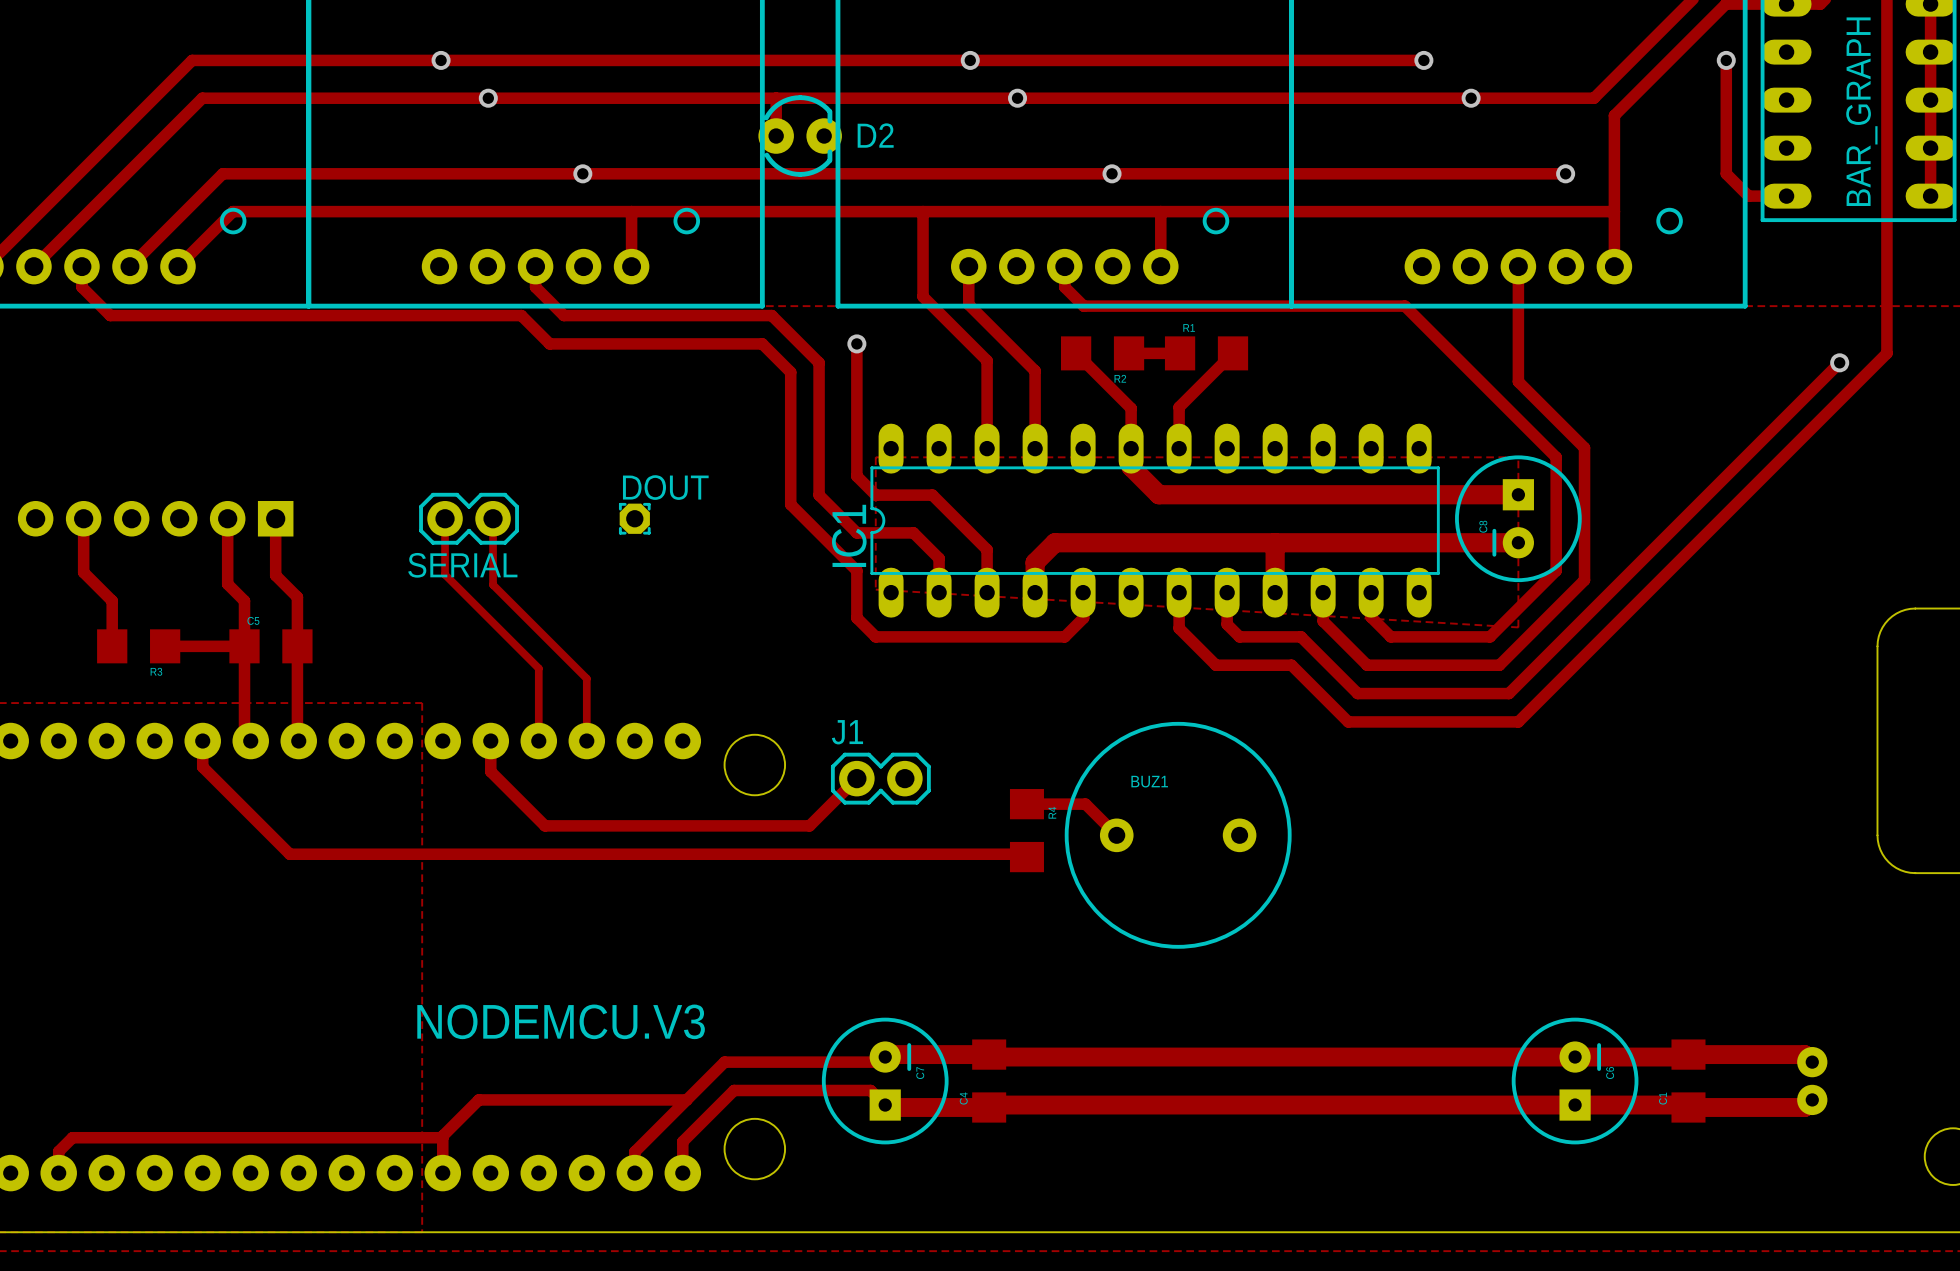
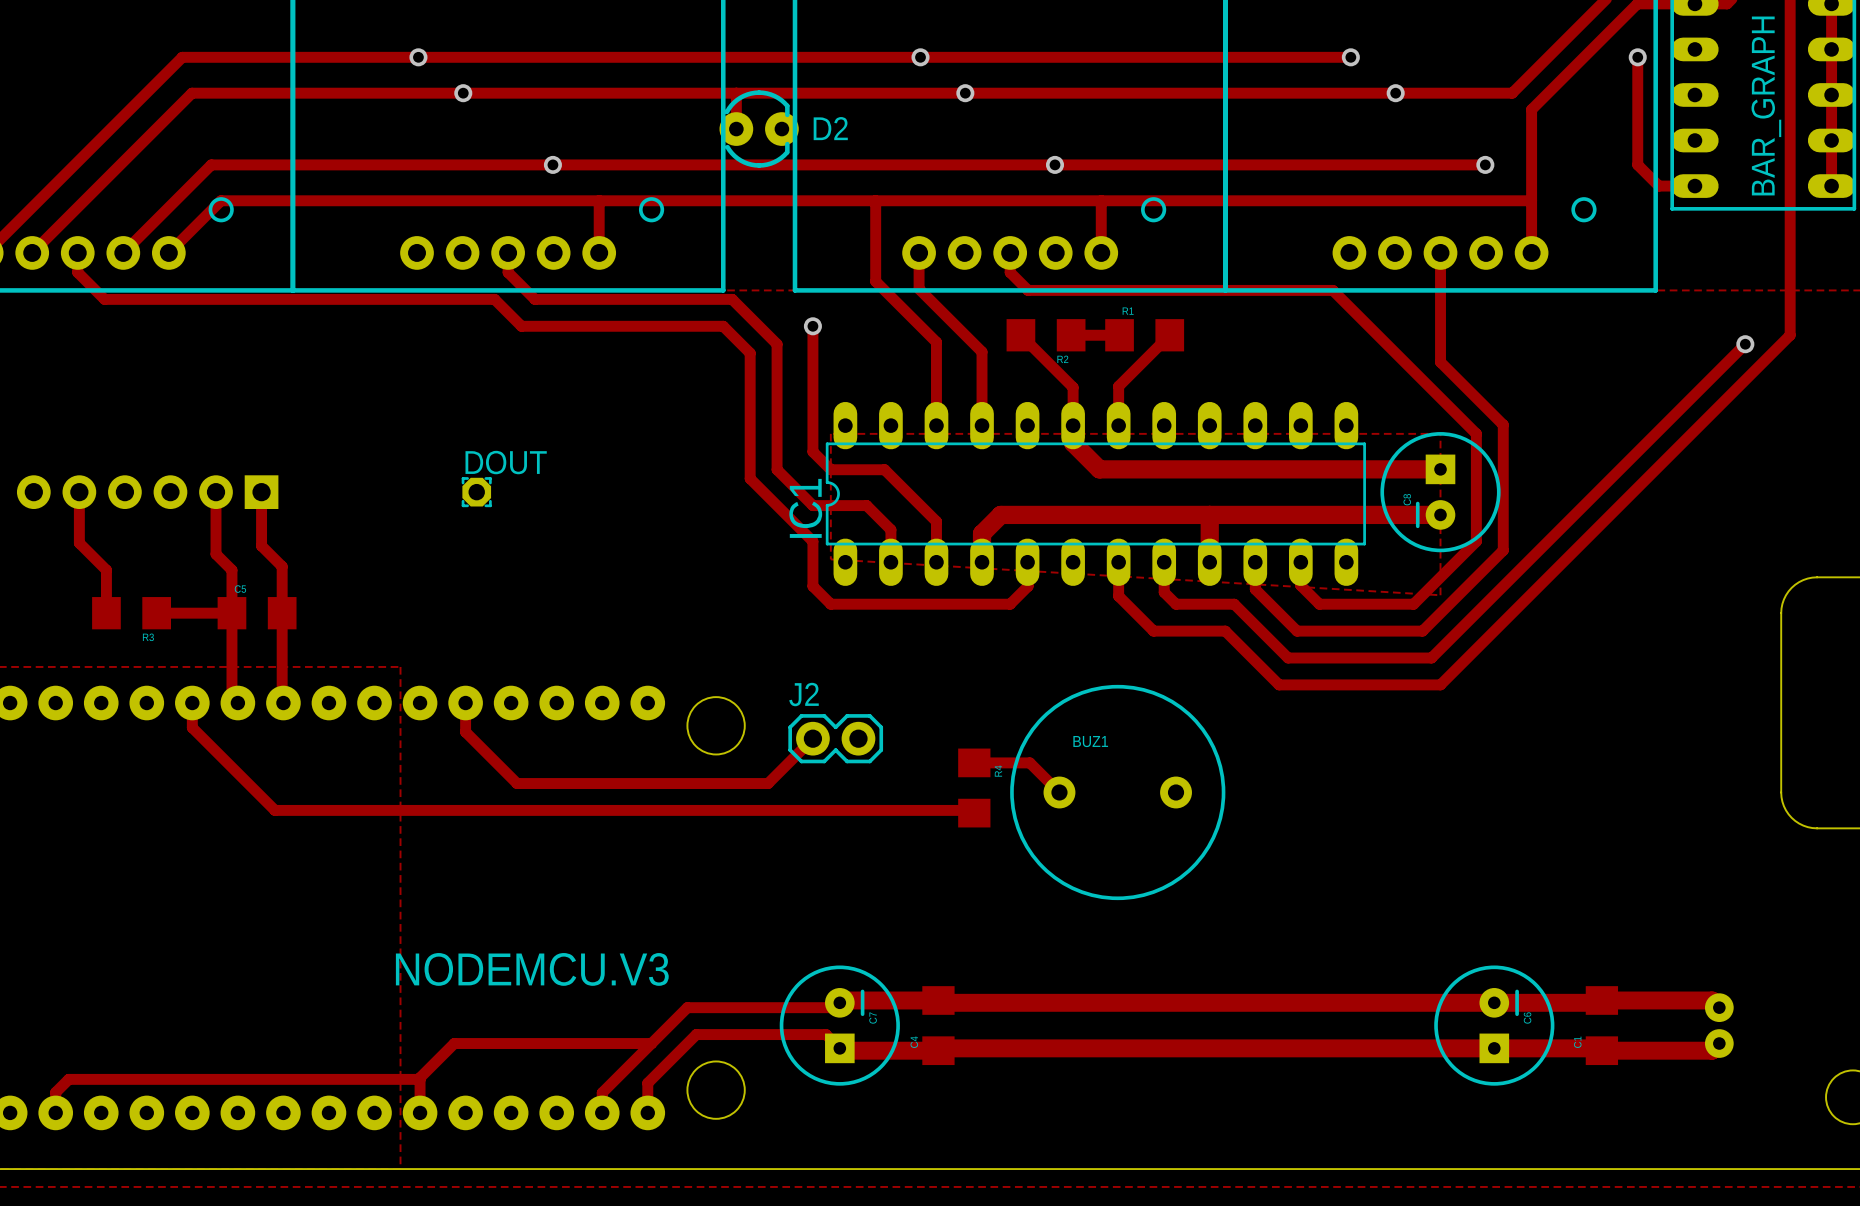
track: (445, 518) (445, 574) (538, 668) (538, 741) -> none
SERIAL: (469, 518) -> none
track: (493, 518) (493, 584) (586, 678) (586, 741) -> none
DOUT position: (634, 518) -> (476, 492)
J1 name: J1 (847, 732) -> J2 (804, 694)

